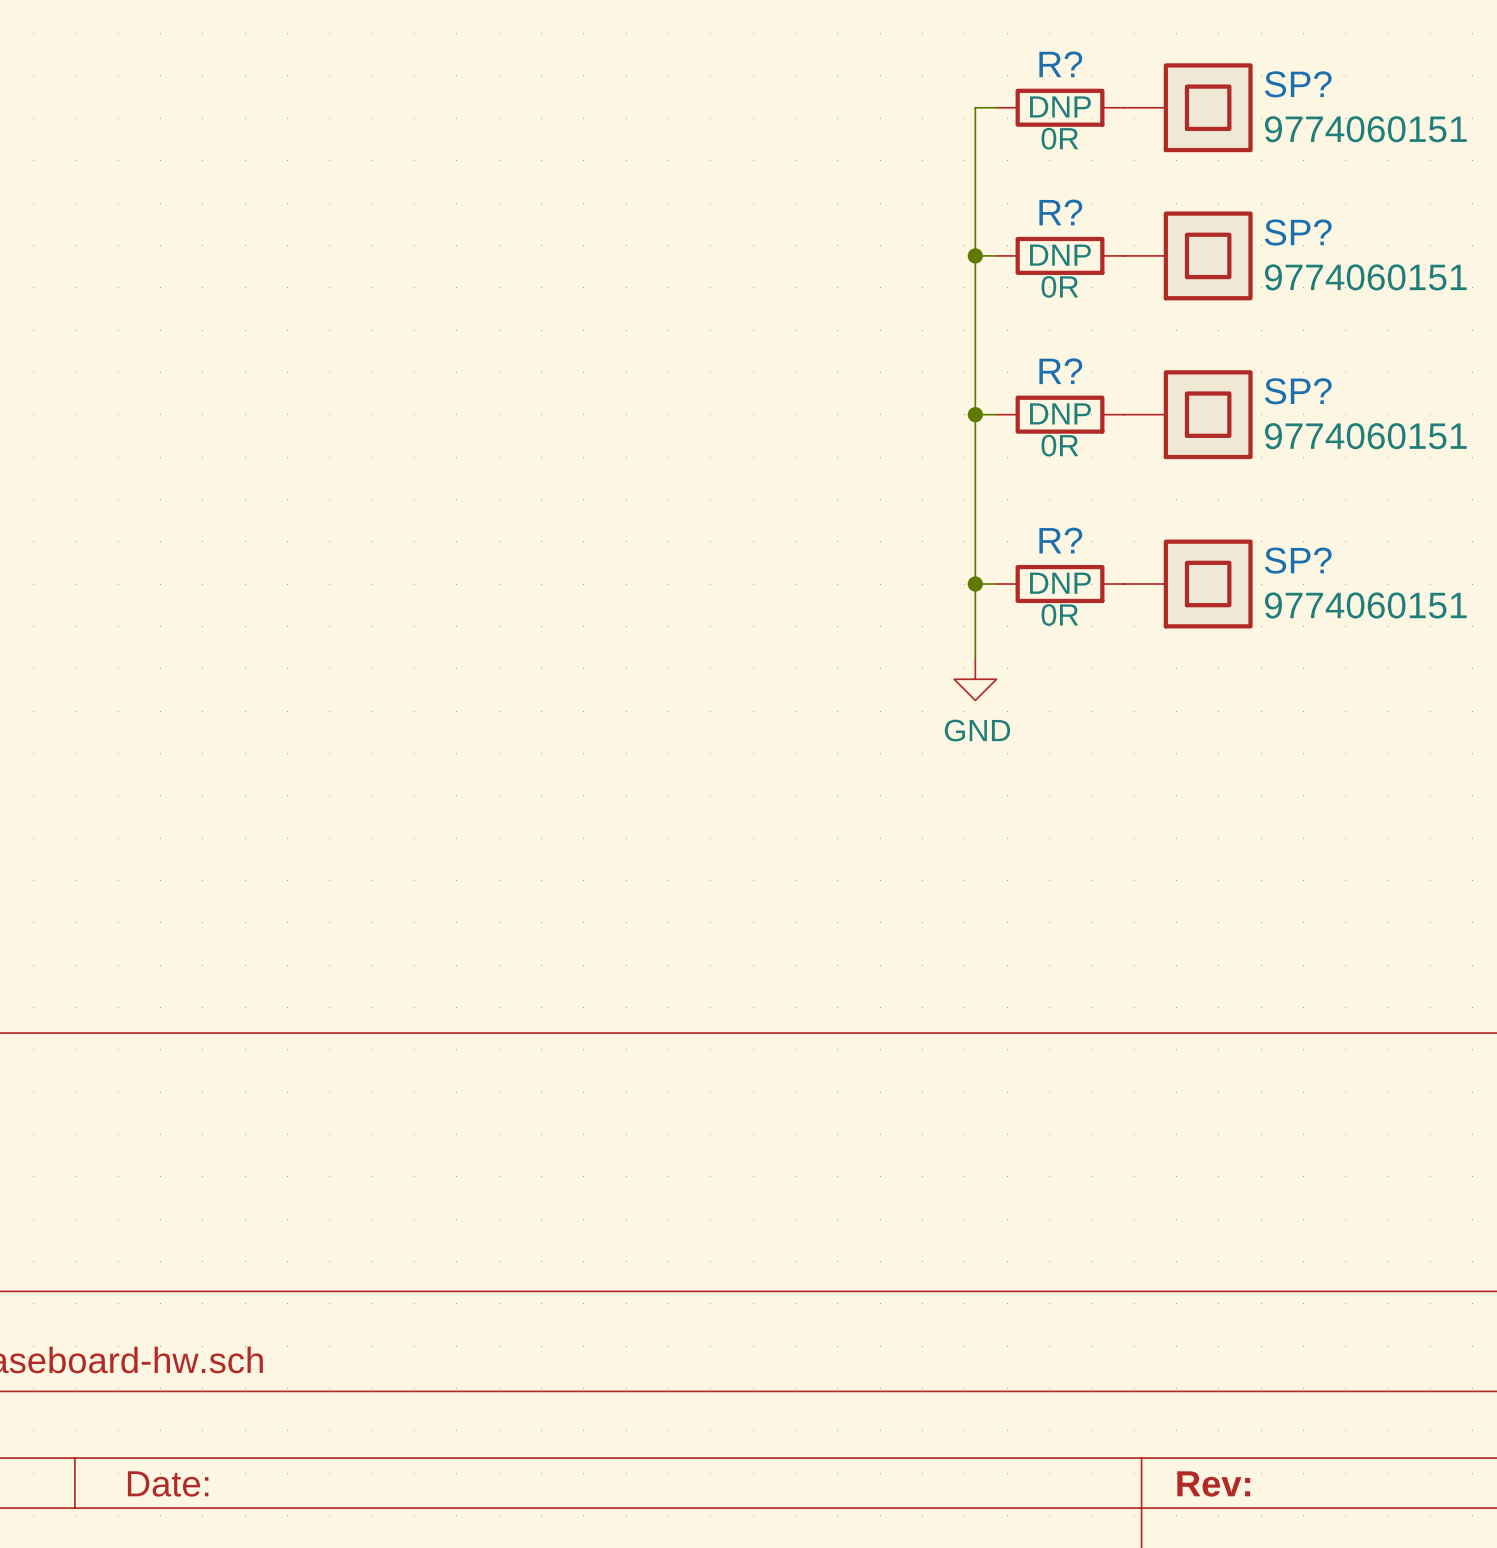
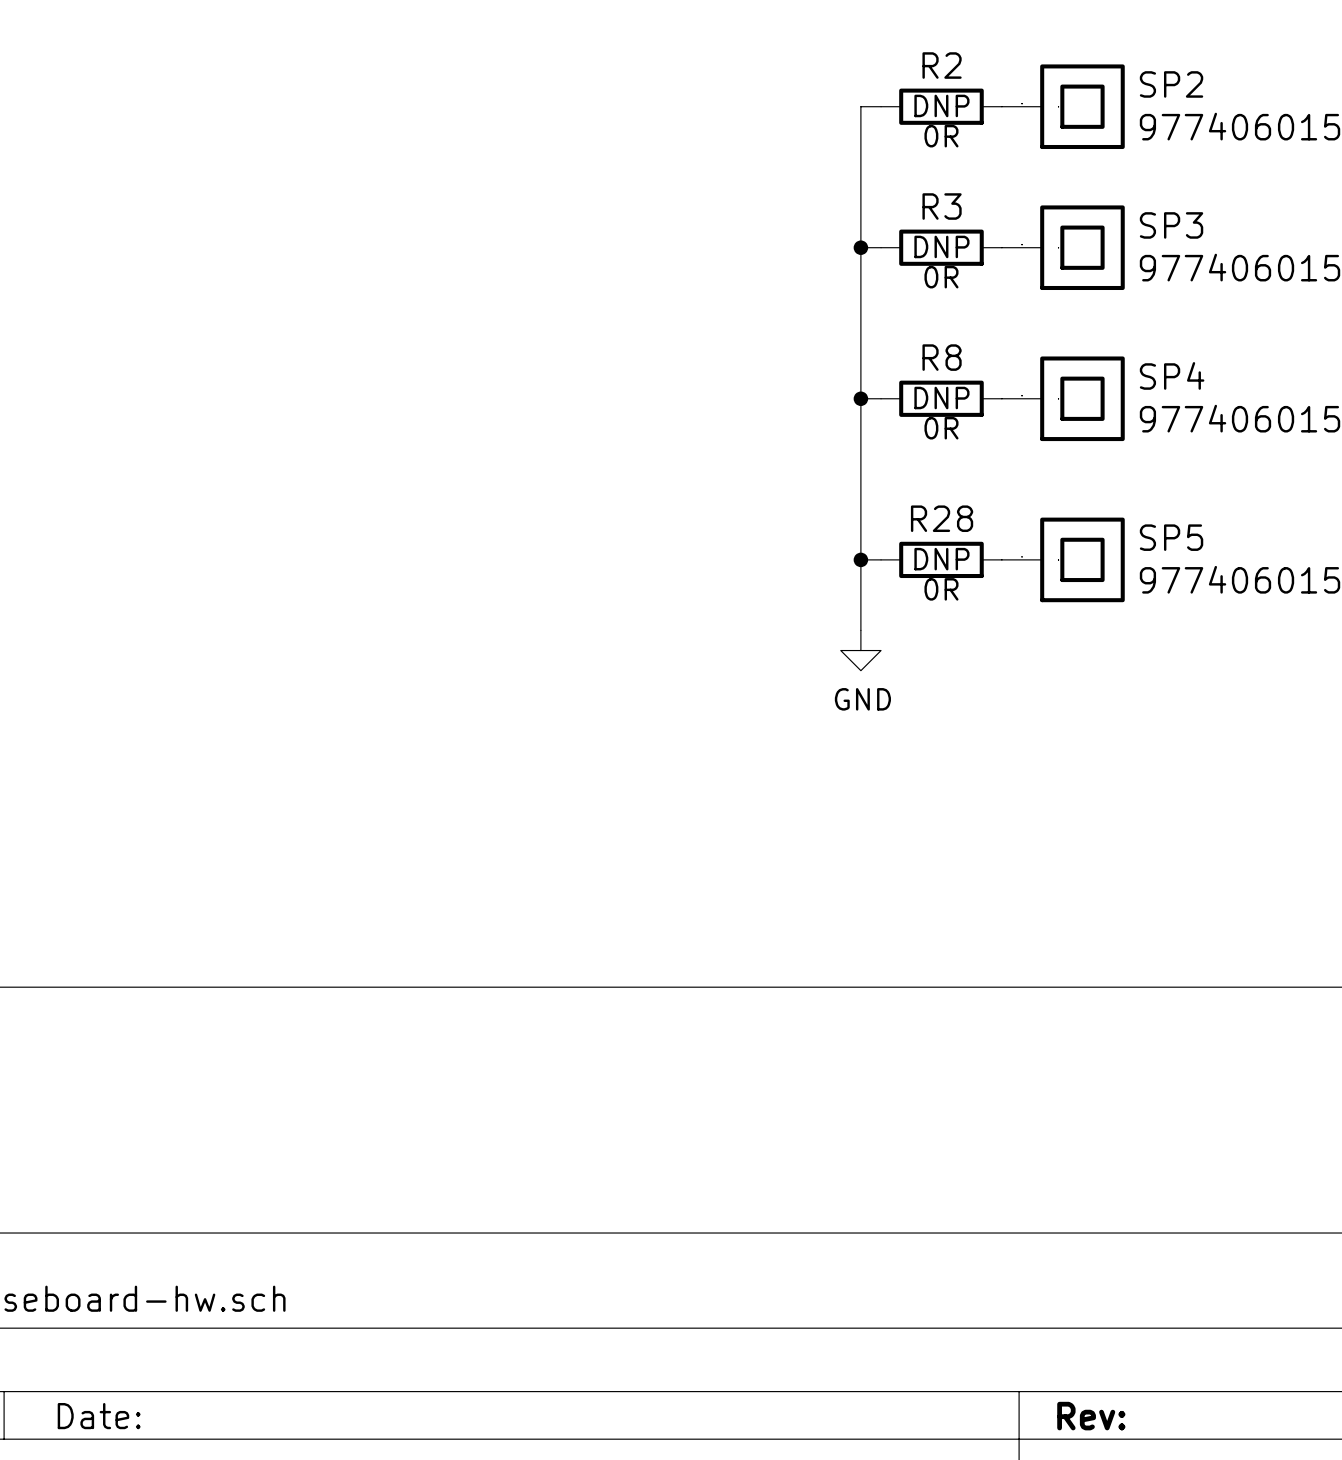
R? name: R? (1060, 64) -> R2 (942, 65)
SP? name: SP? (1298, 84) -> SP2 (1171, 84)
R? name: R? (1060, 212) -> R3 (942, 206)
SP? name: SP? (1298, 232) -> SP3 (1171, 225)
R? name: R? (1060, 371) -> R8 (942, 357)
SP? name: SP? (1298, 391) -> SP4 (1172, 375)
R? name: R? (1060, 540) -> R28 (942, 518)
SP? name: SP? (1298, 560) -> SP5 (1171, 537)

